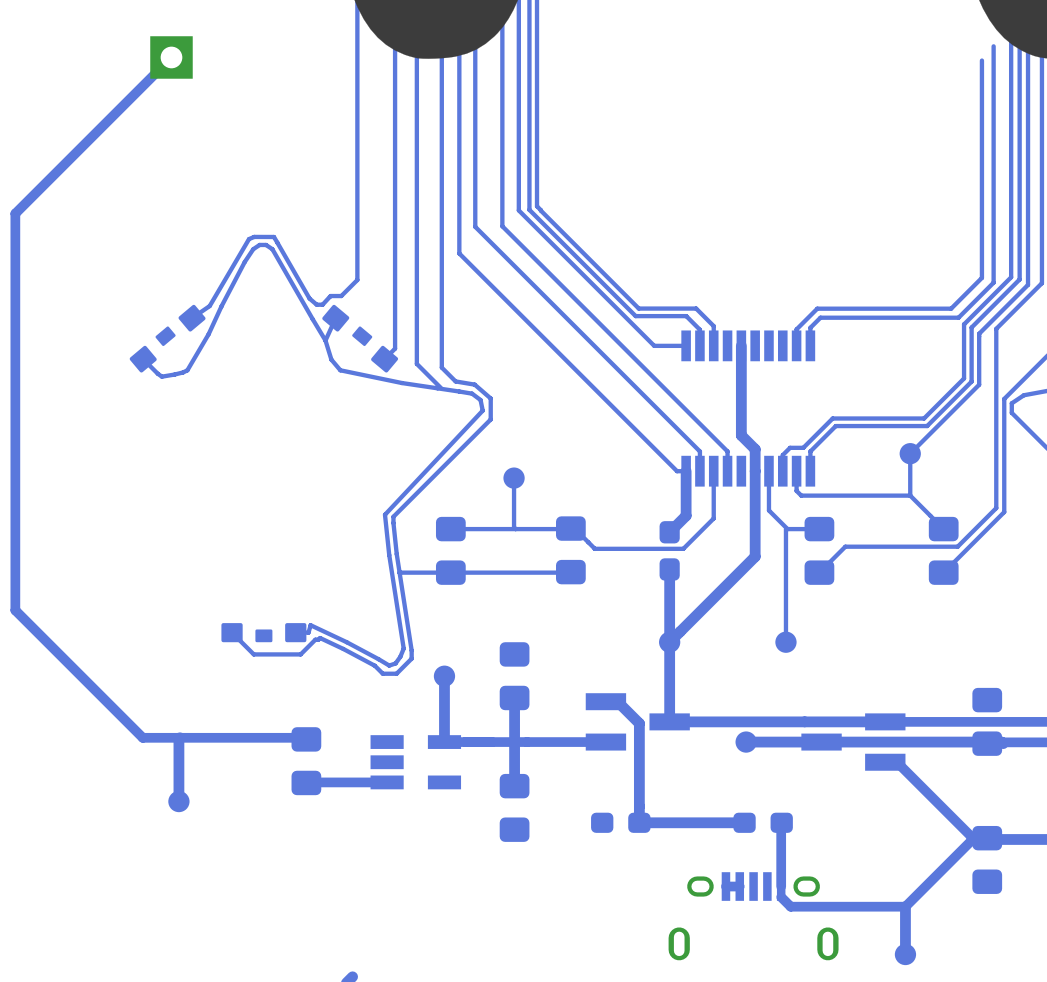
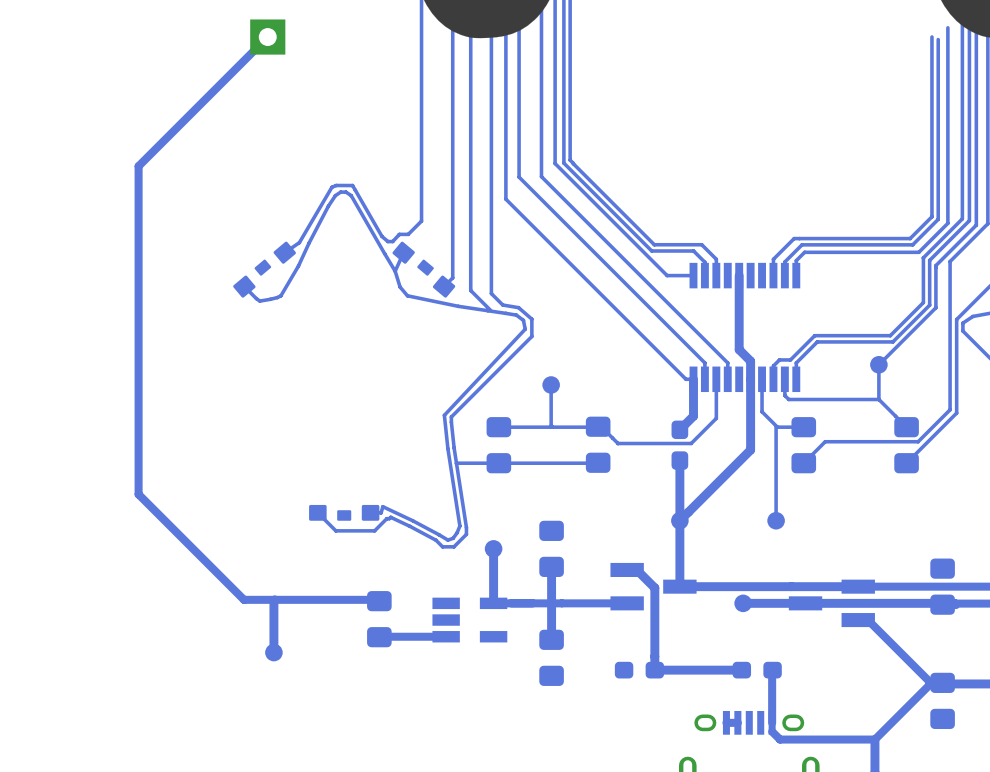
bottom track: none -> (931, 36) (931, 216) (910, 238) (794, 238) (773, 259) (773, 275)

